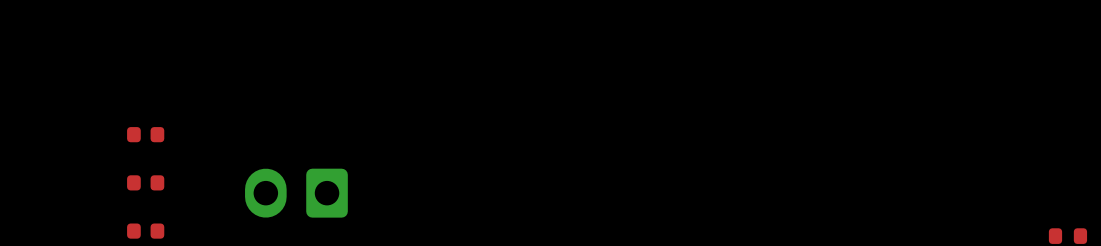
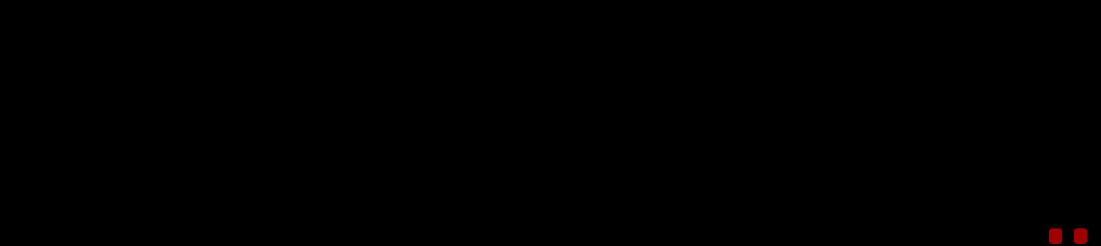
part: (145, 134) -> none
part: (145, 182) -> none
part: (296, 193) -> none
part: (145, 231) -> none

